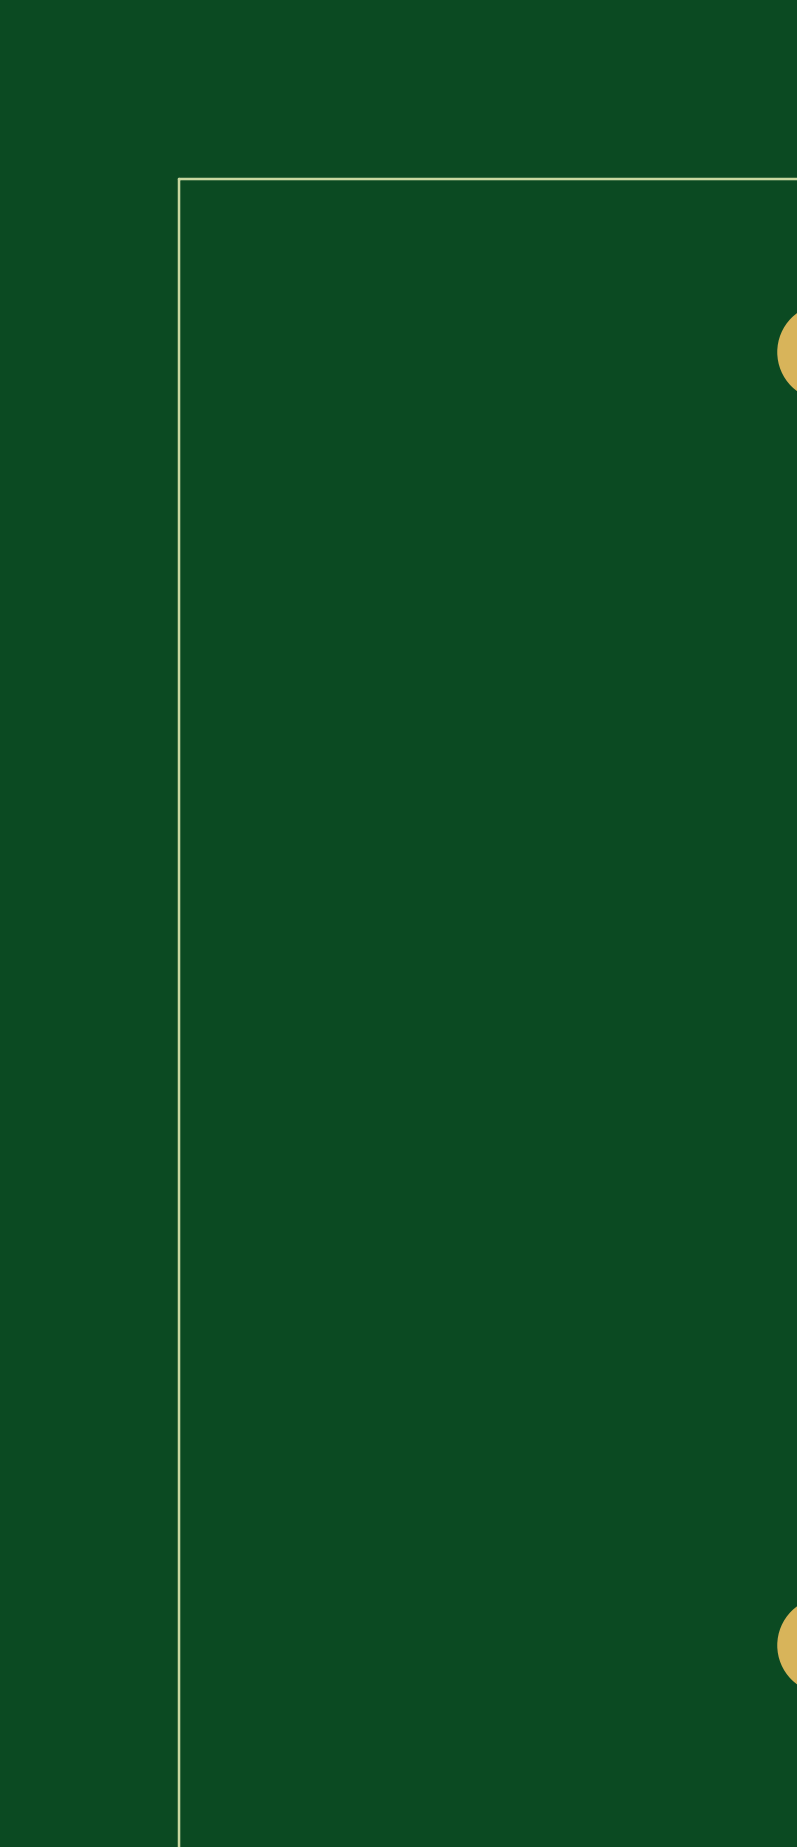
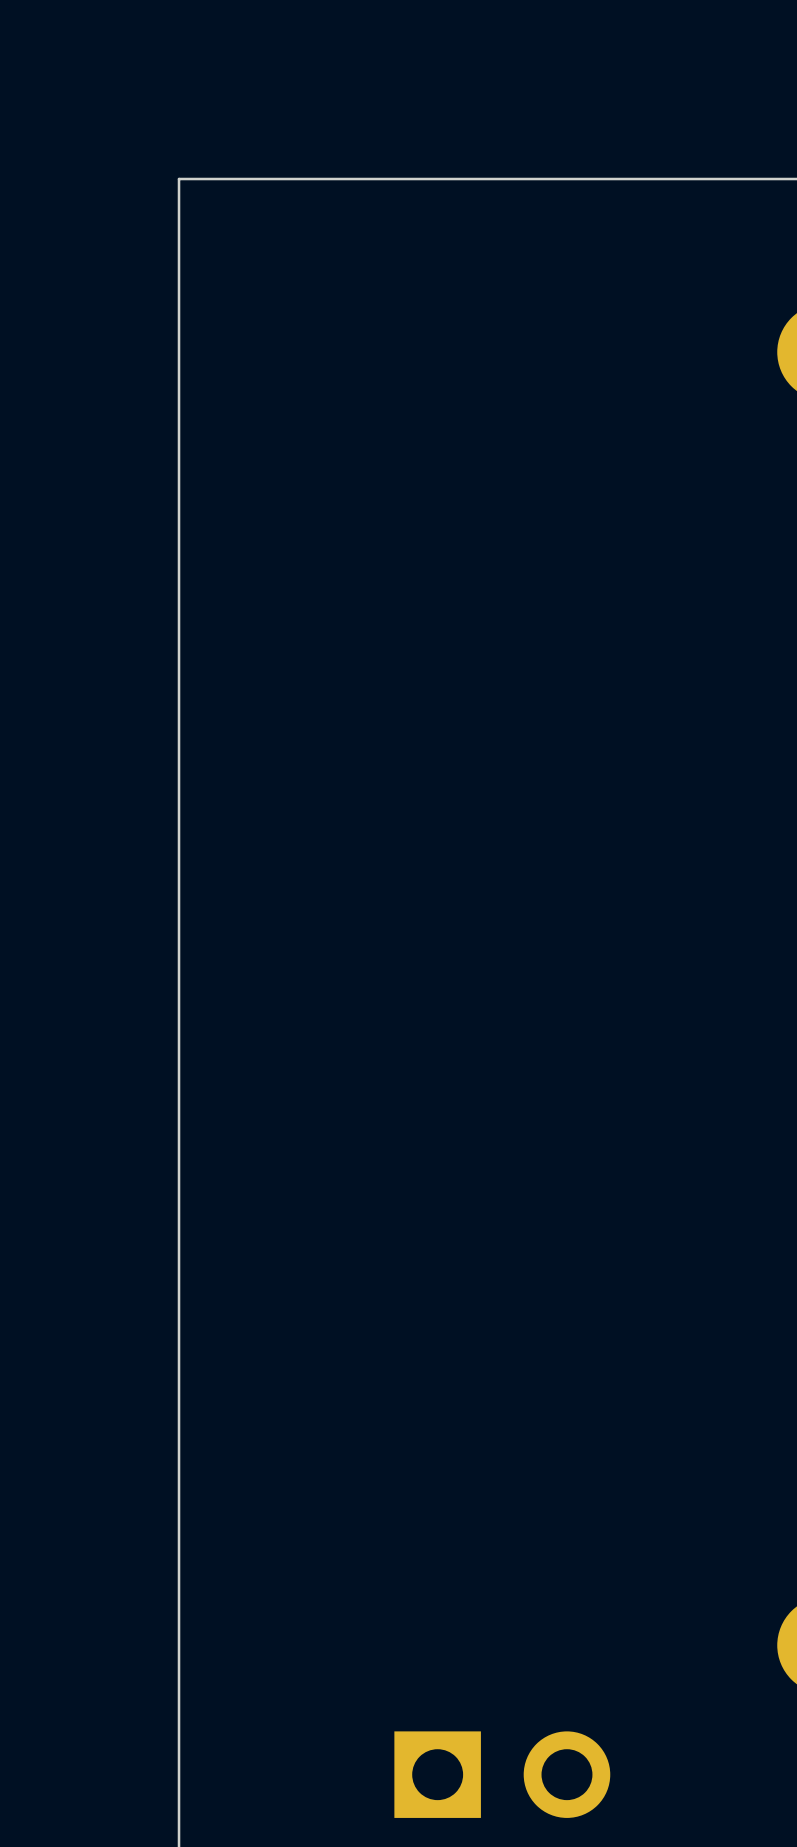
part: none -> (502, 1774)

